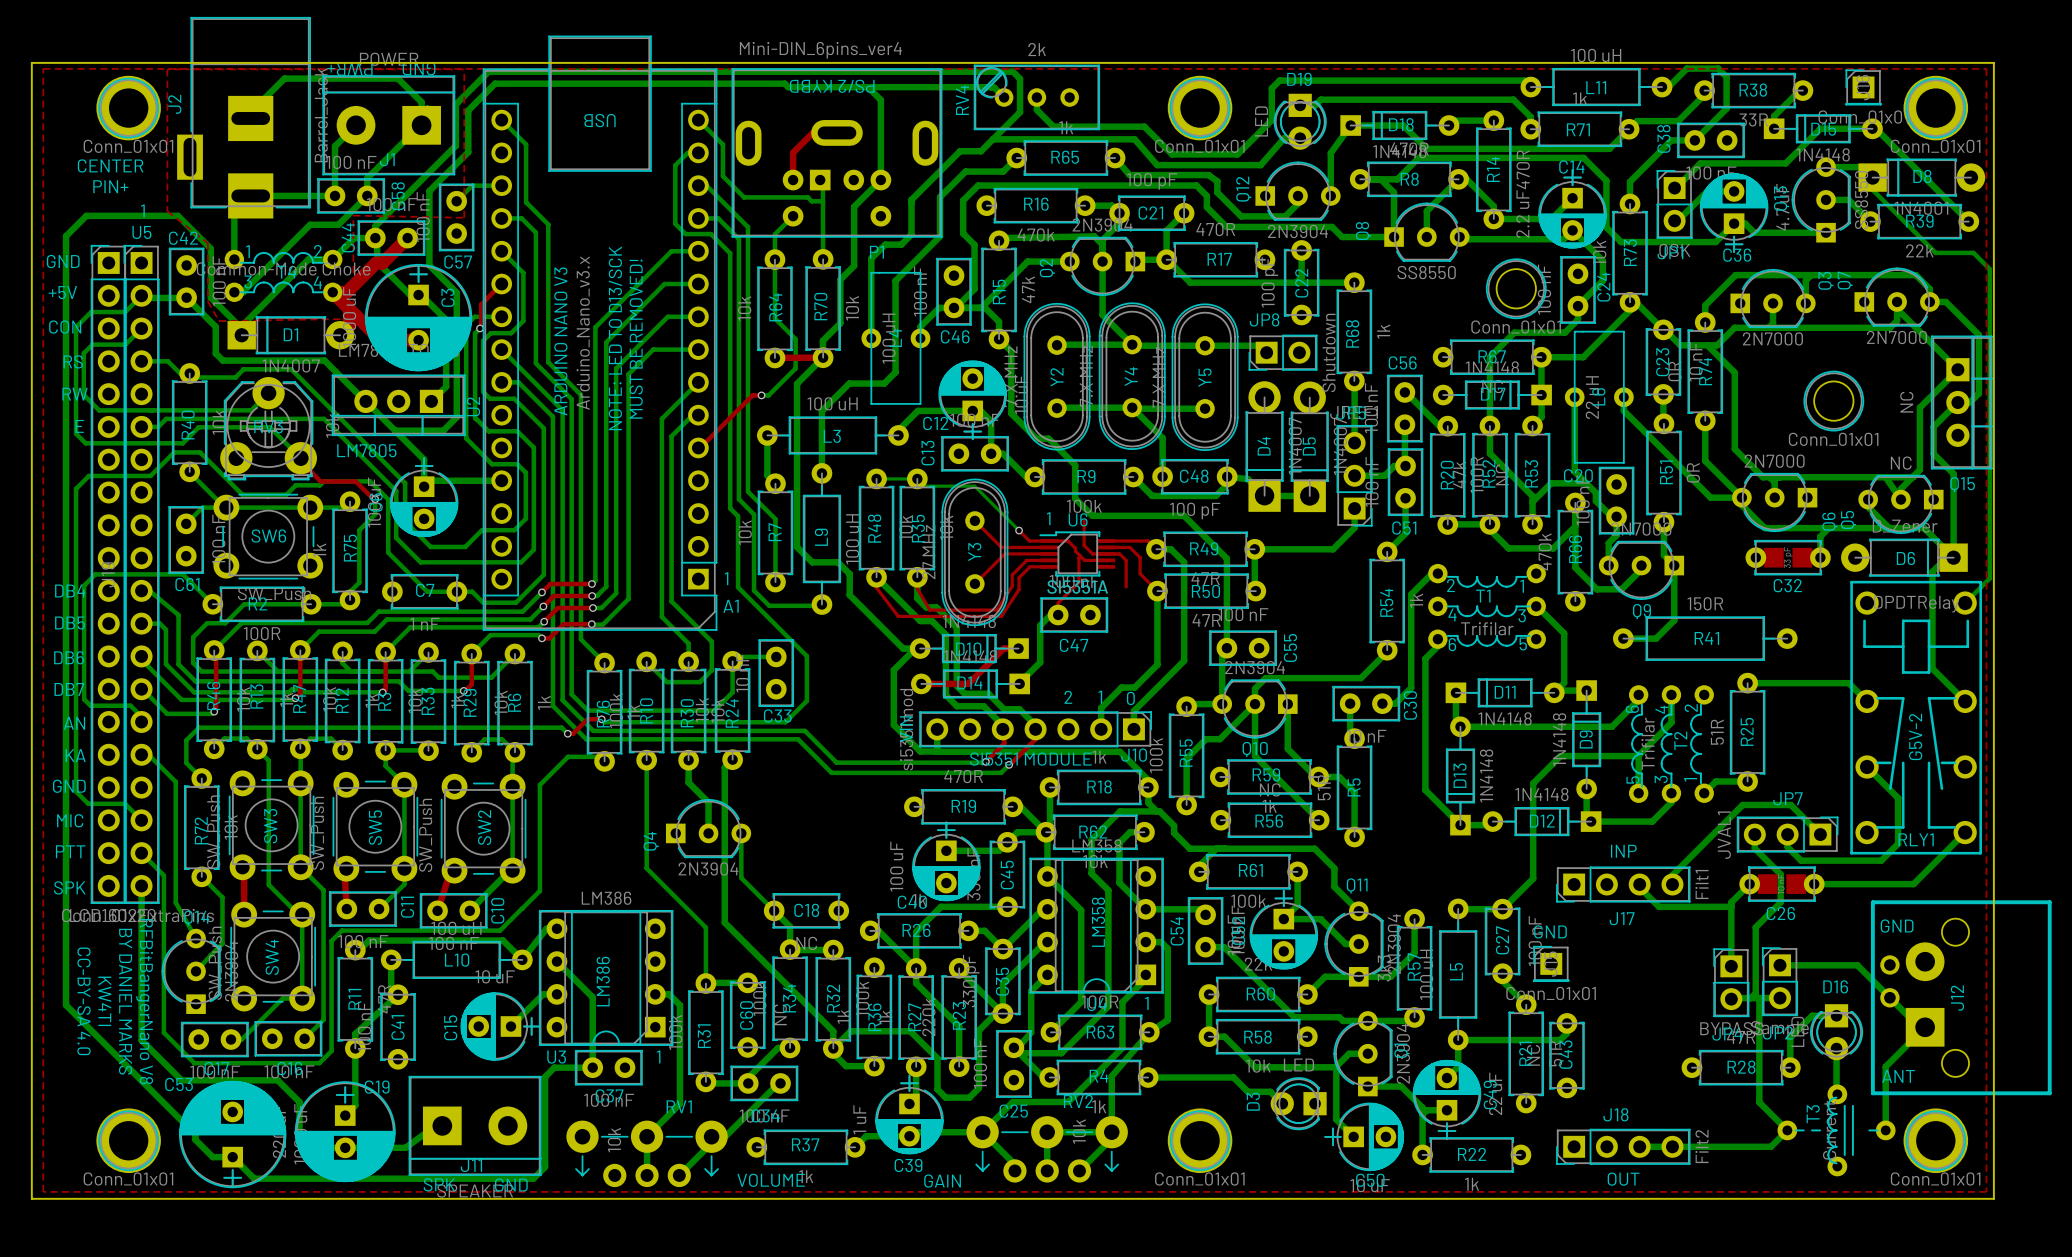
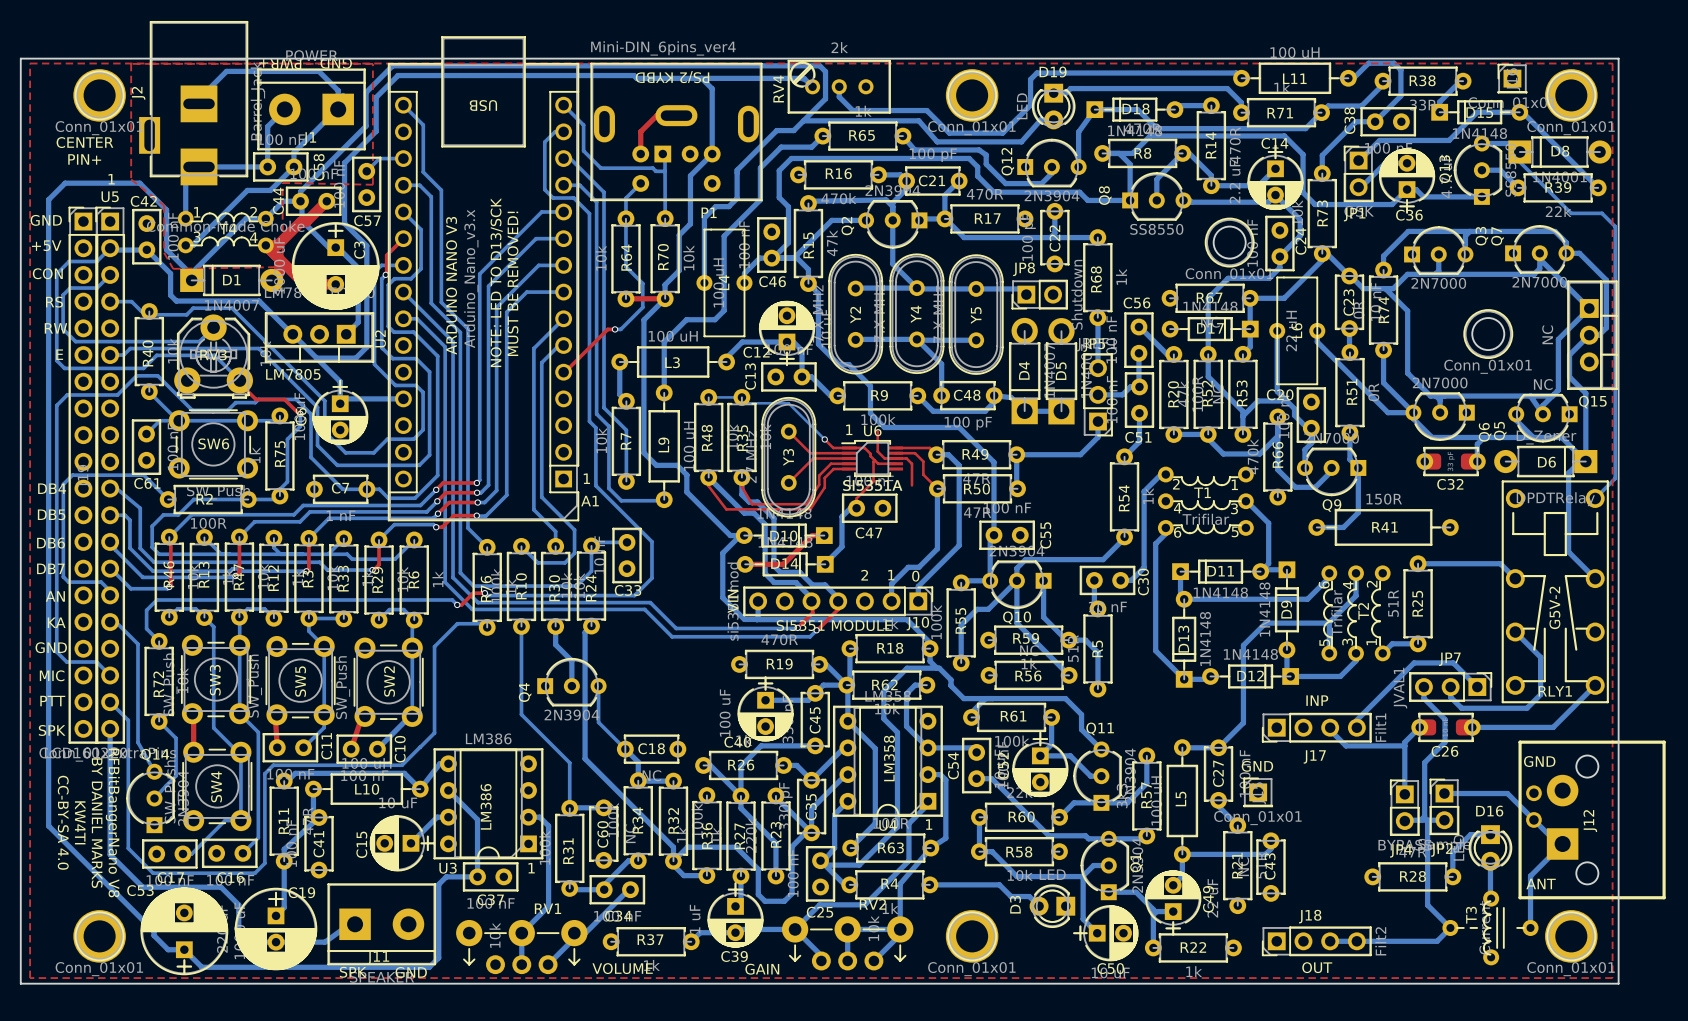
C32 footprint: [1745, 539, 1831, 576] -> [1416, 447, 1486, 476]
C26 footprint: [1739, 866, 1825, 902] -> [1411, 712, 1481, 742]

